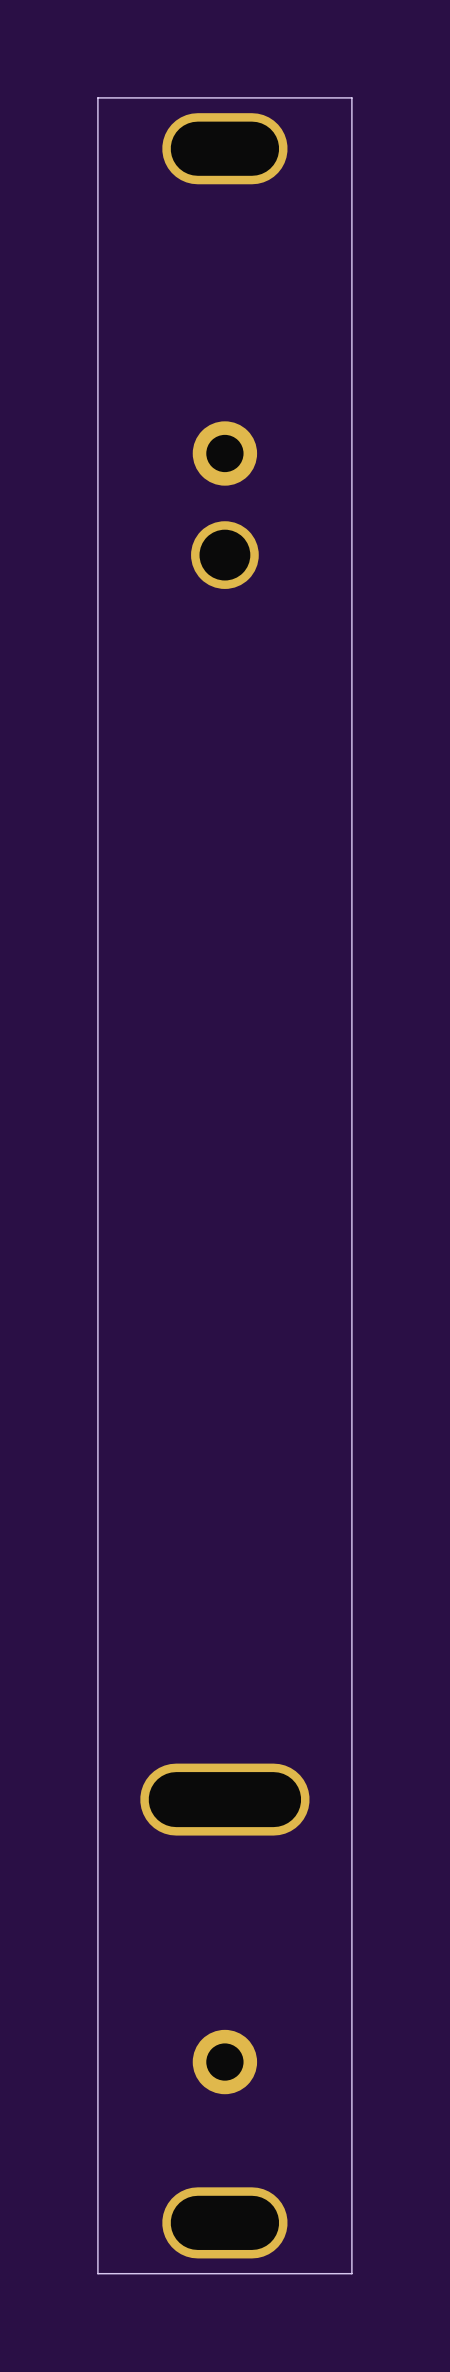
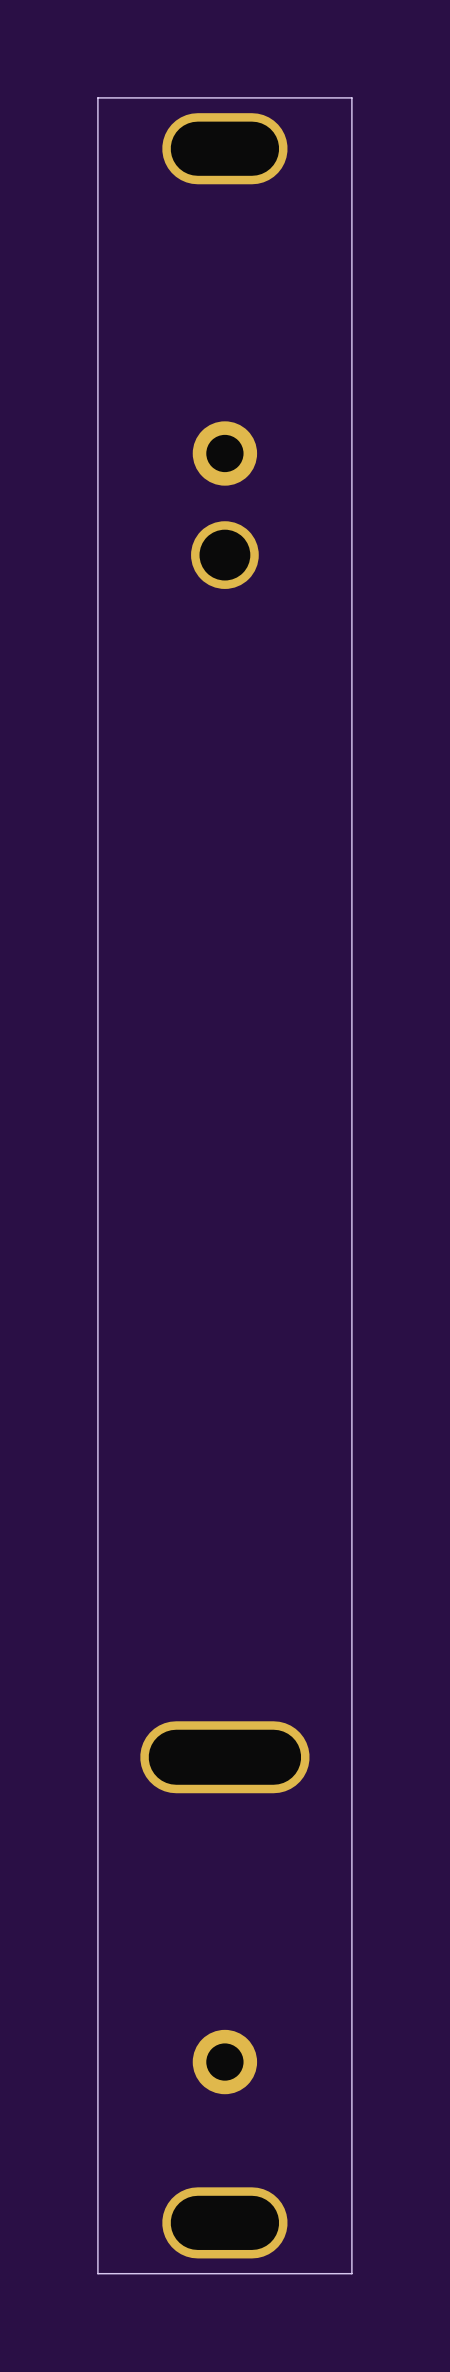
part position: (224, 1799) -> (224, 1757)

